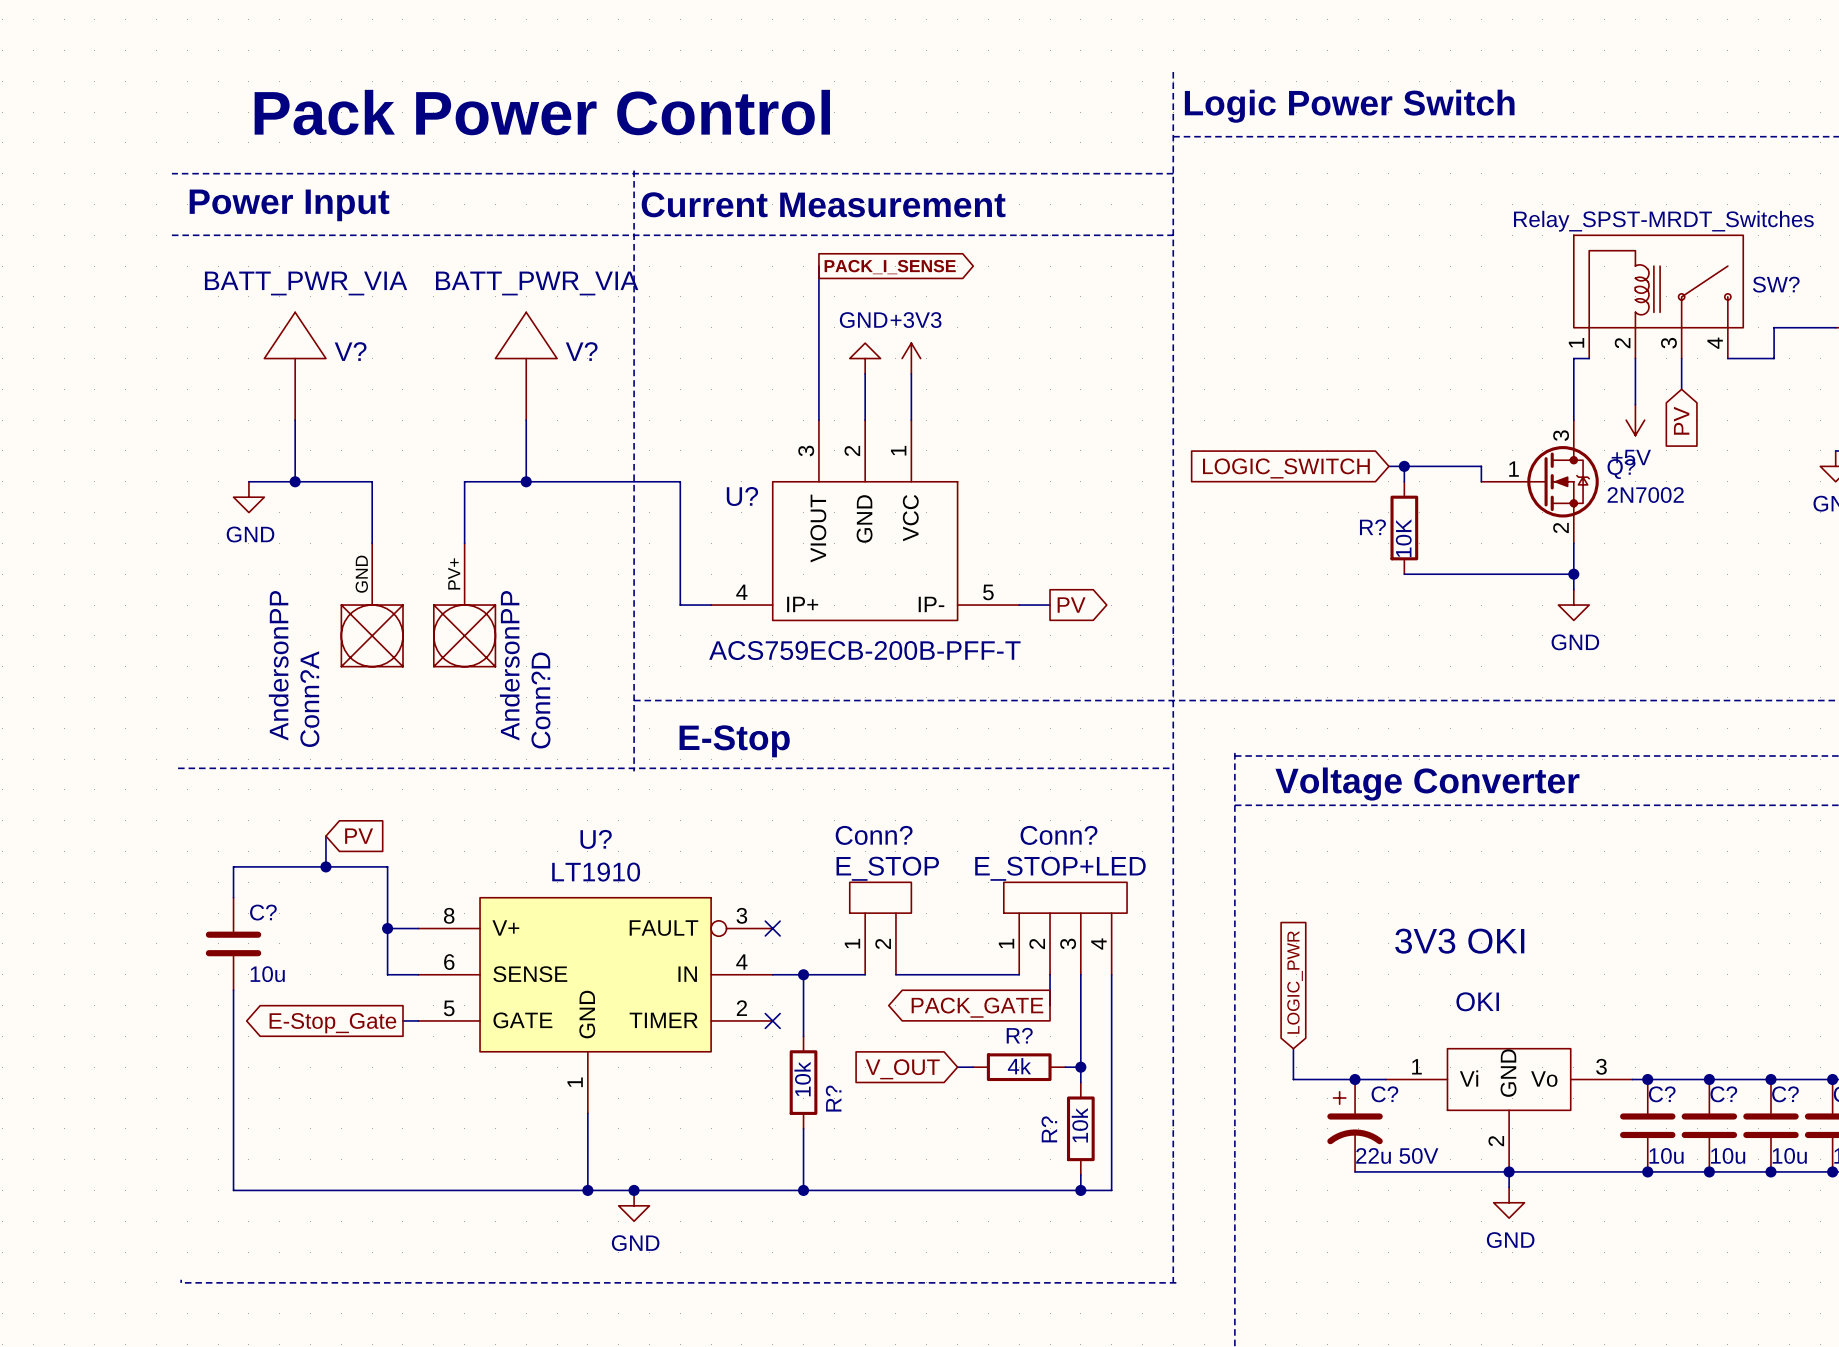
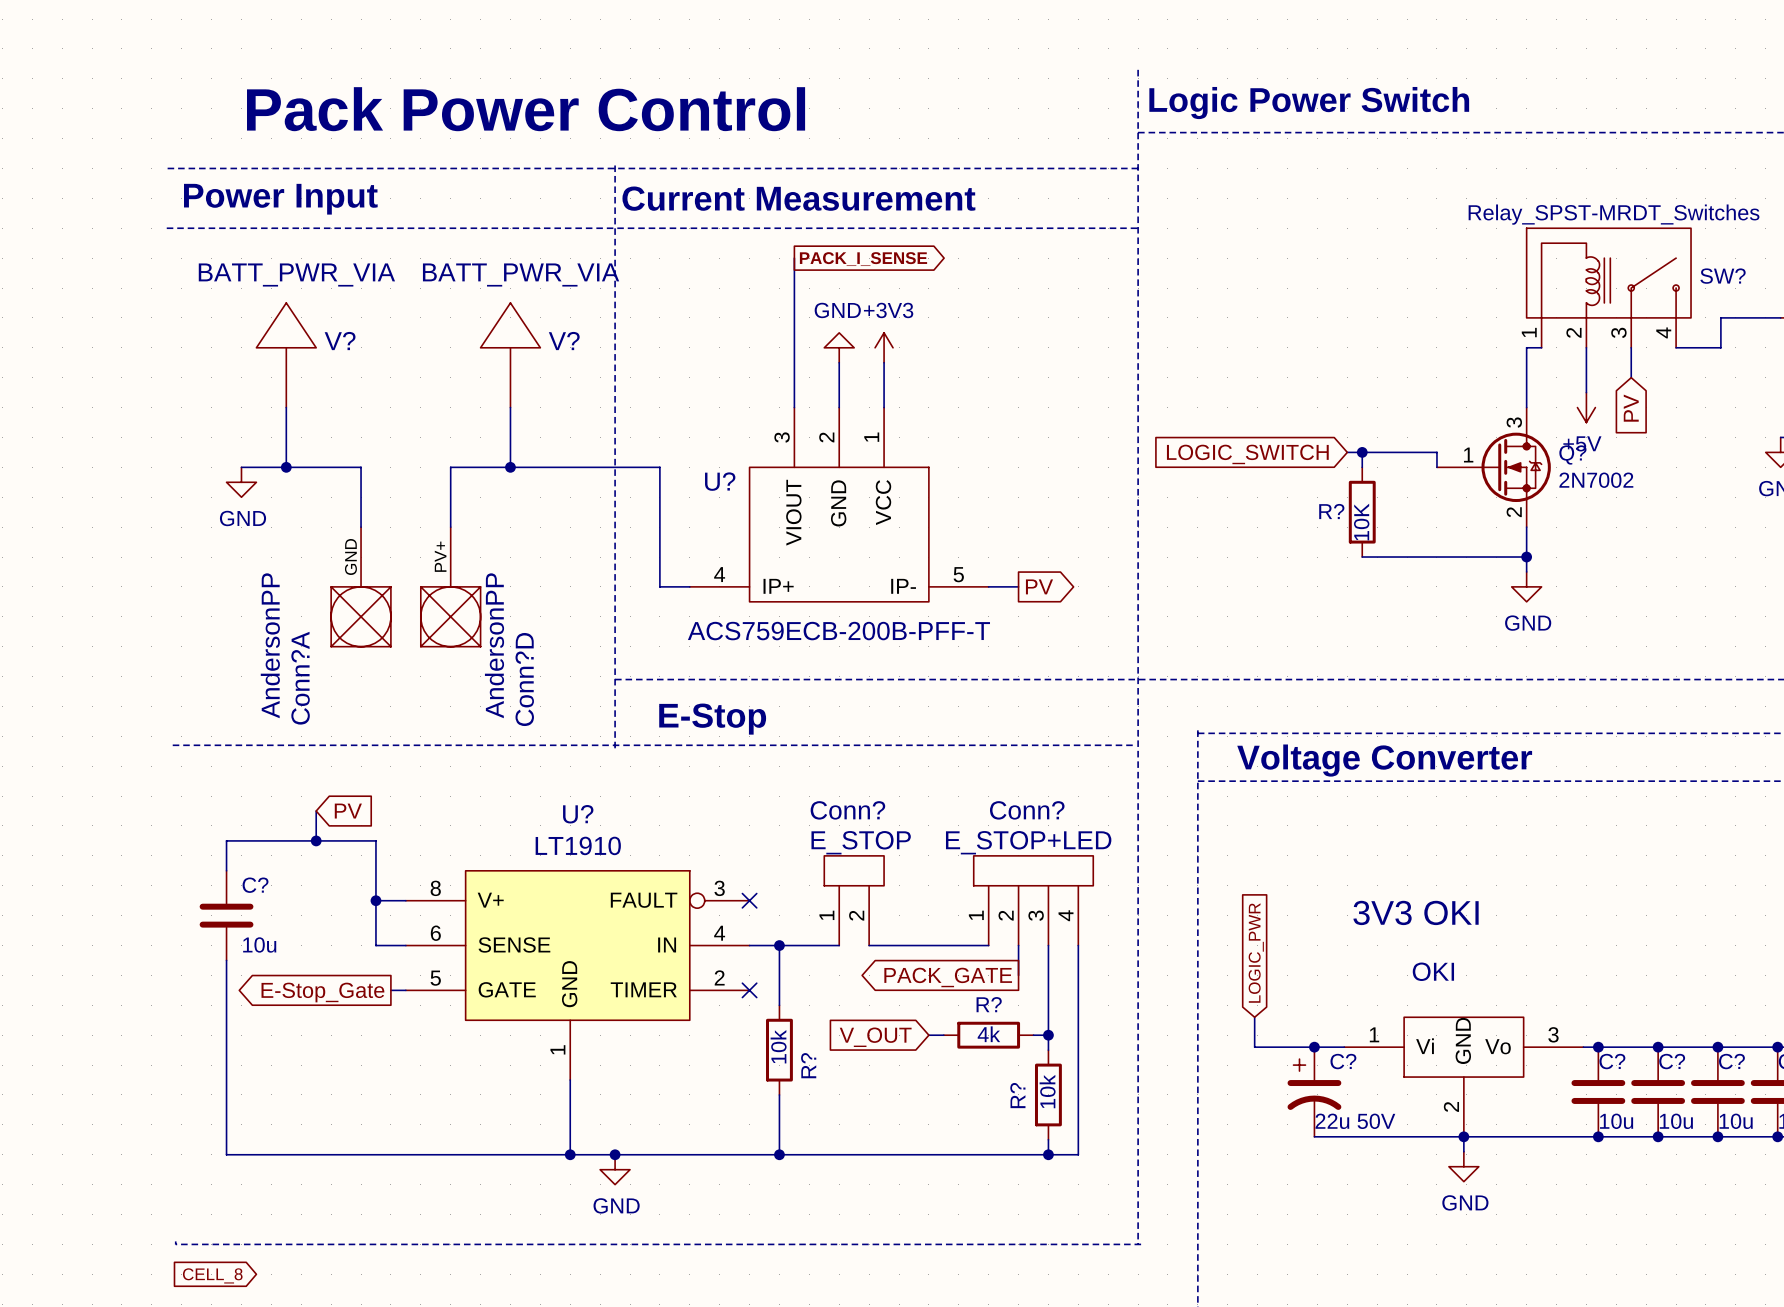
global label: none -> CELL_8 (212, 1275)

